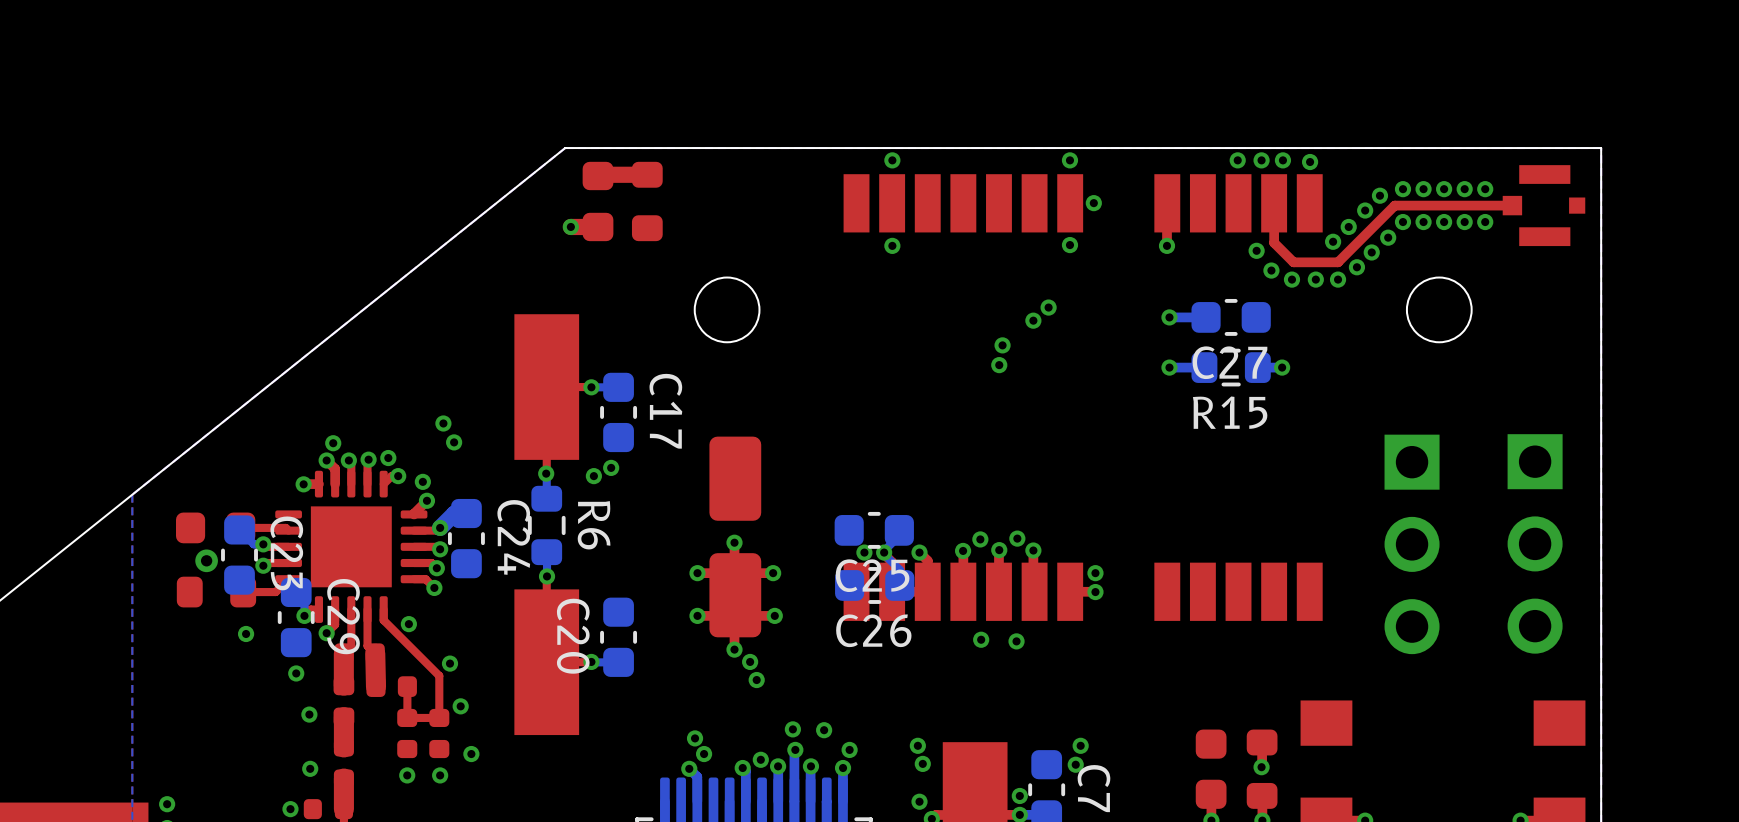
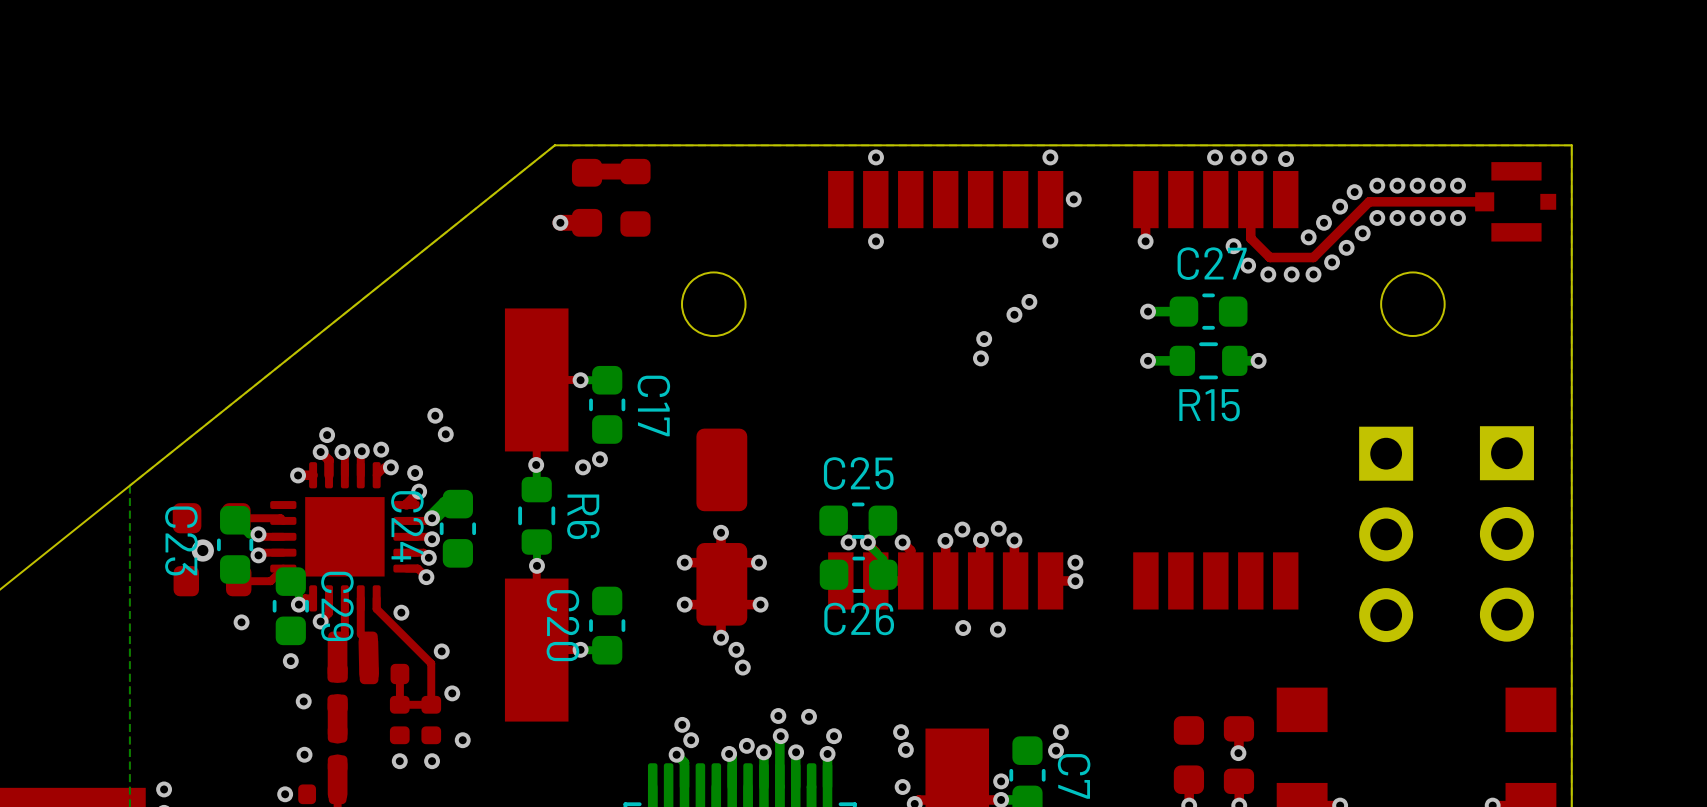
C27 name position: C27 (1229, 362) -> C27 (1212, 263)
C24 name position: C24 (513, 537) -> C24 (407, 526)
C23 name position: C23 (286, 553) -> C23 (181, 541)
C25 name position: C25 (872, 575) -> C25 (858, 473)

